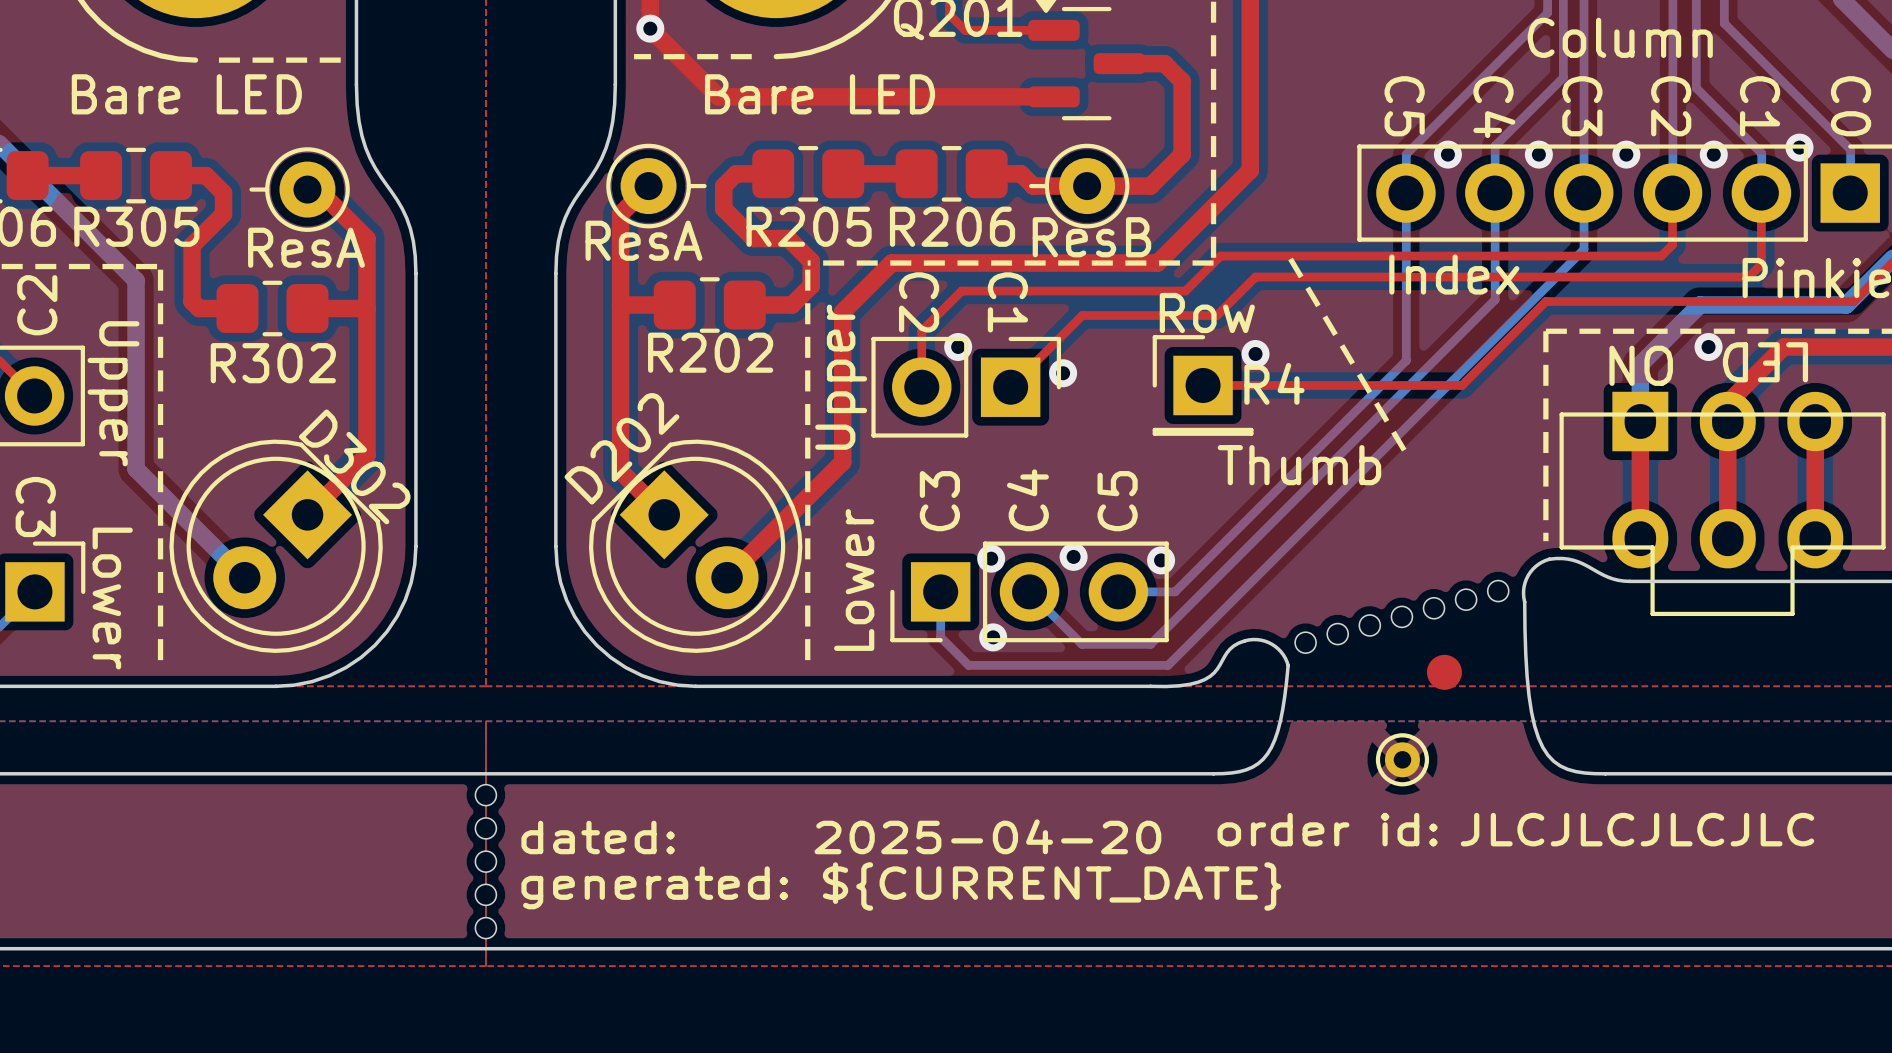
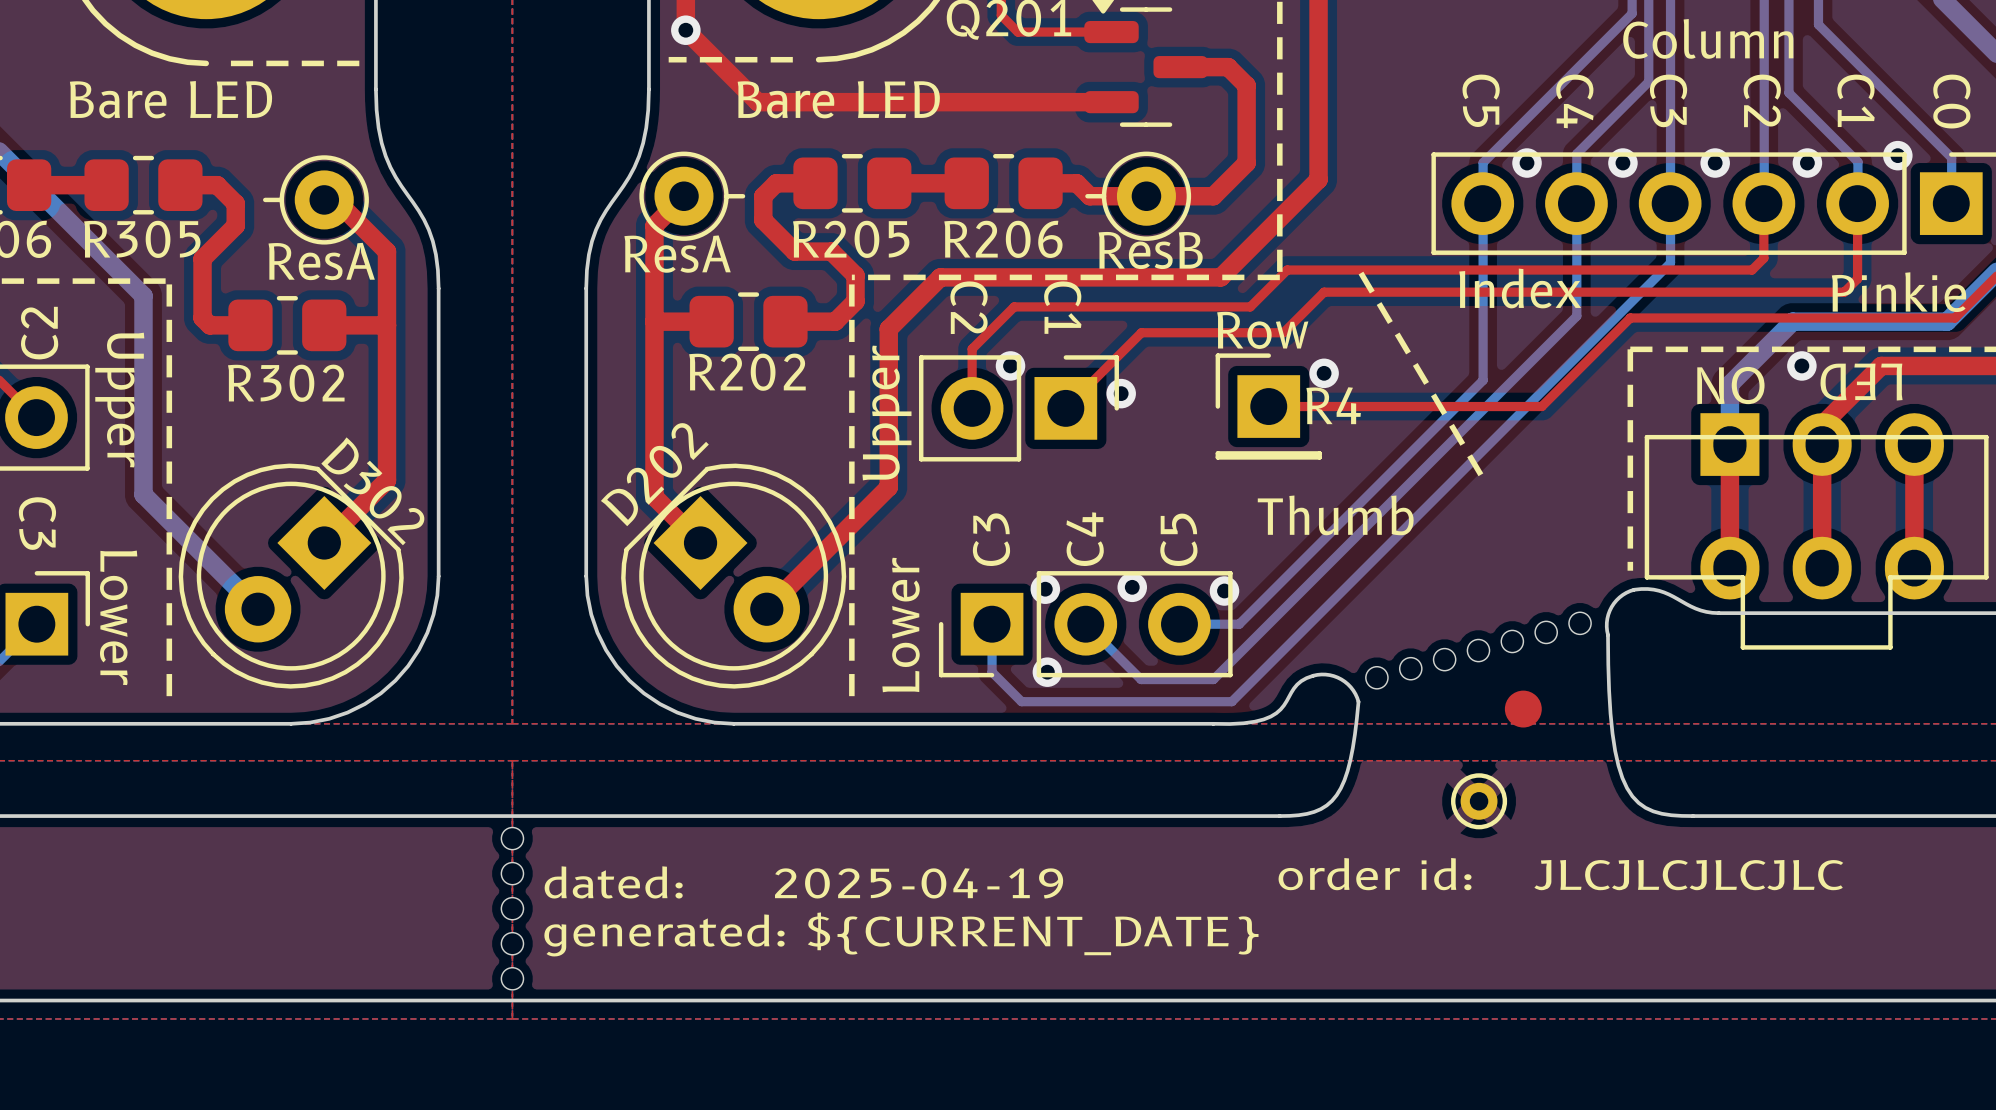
text position: Thumb (1299, 465) -> Thumb (1335, 515)
text: dated: 2025-04-20 (841, 836) -> dated: 2025-04-19 (803, 882)

